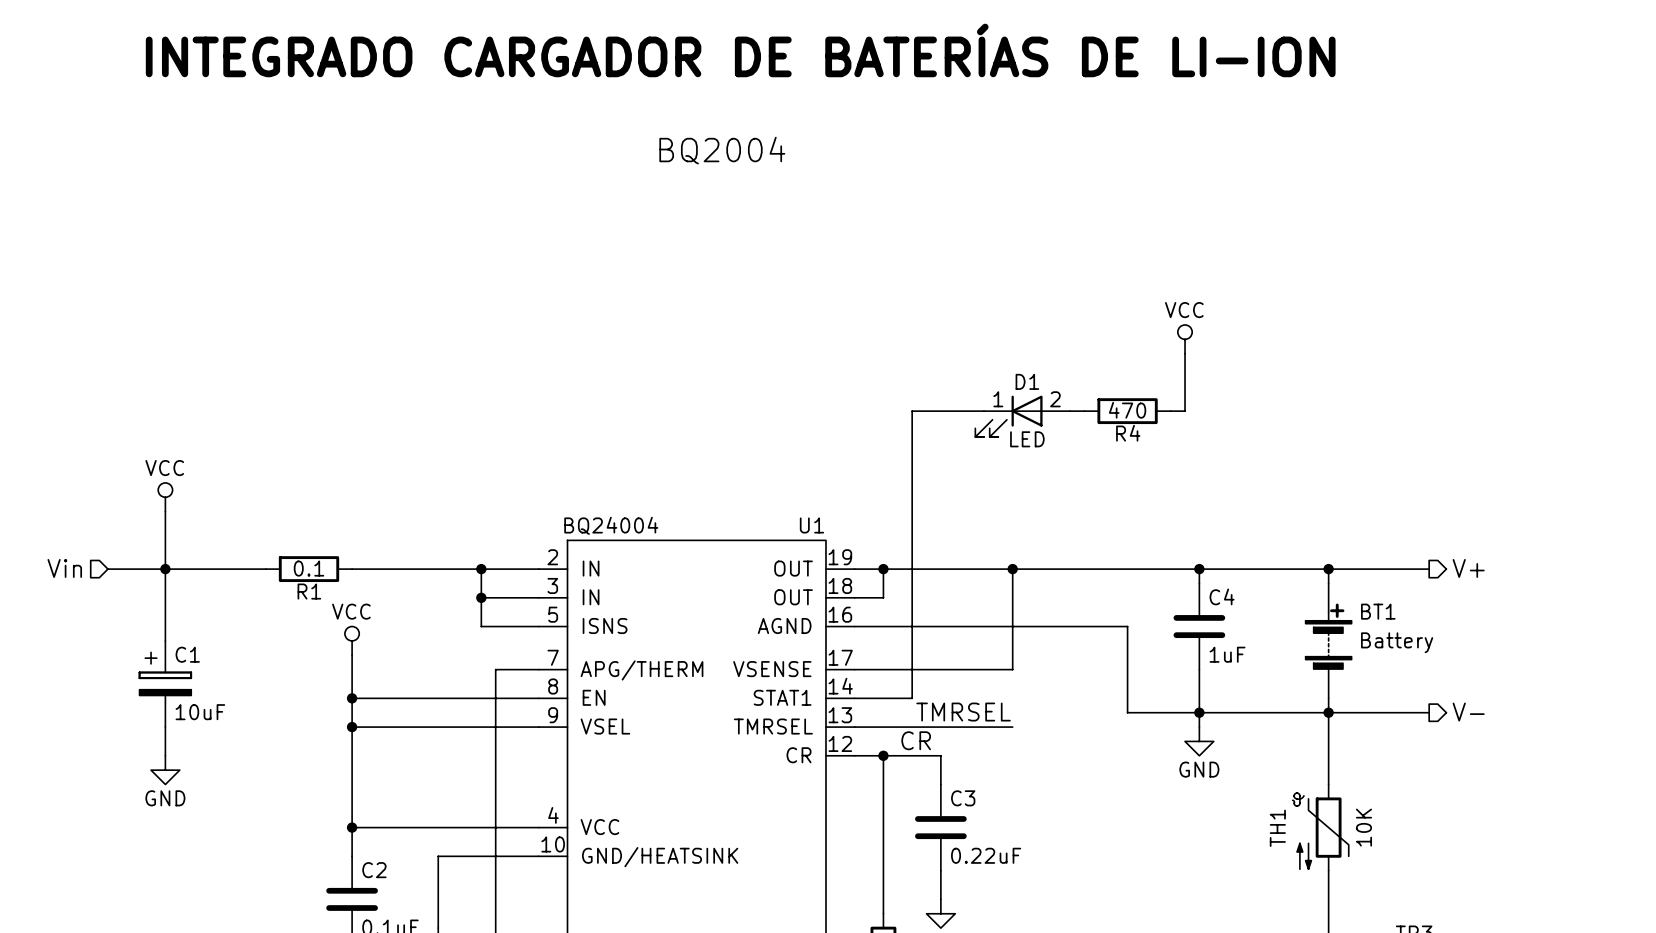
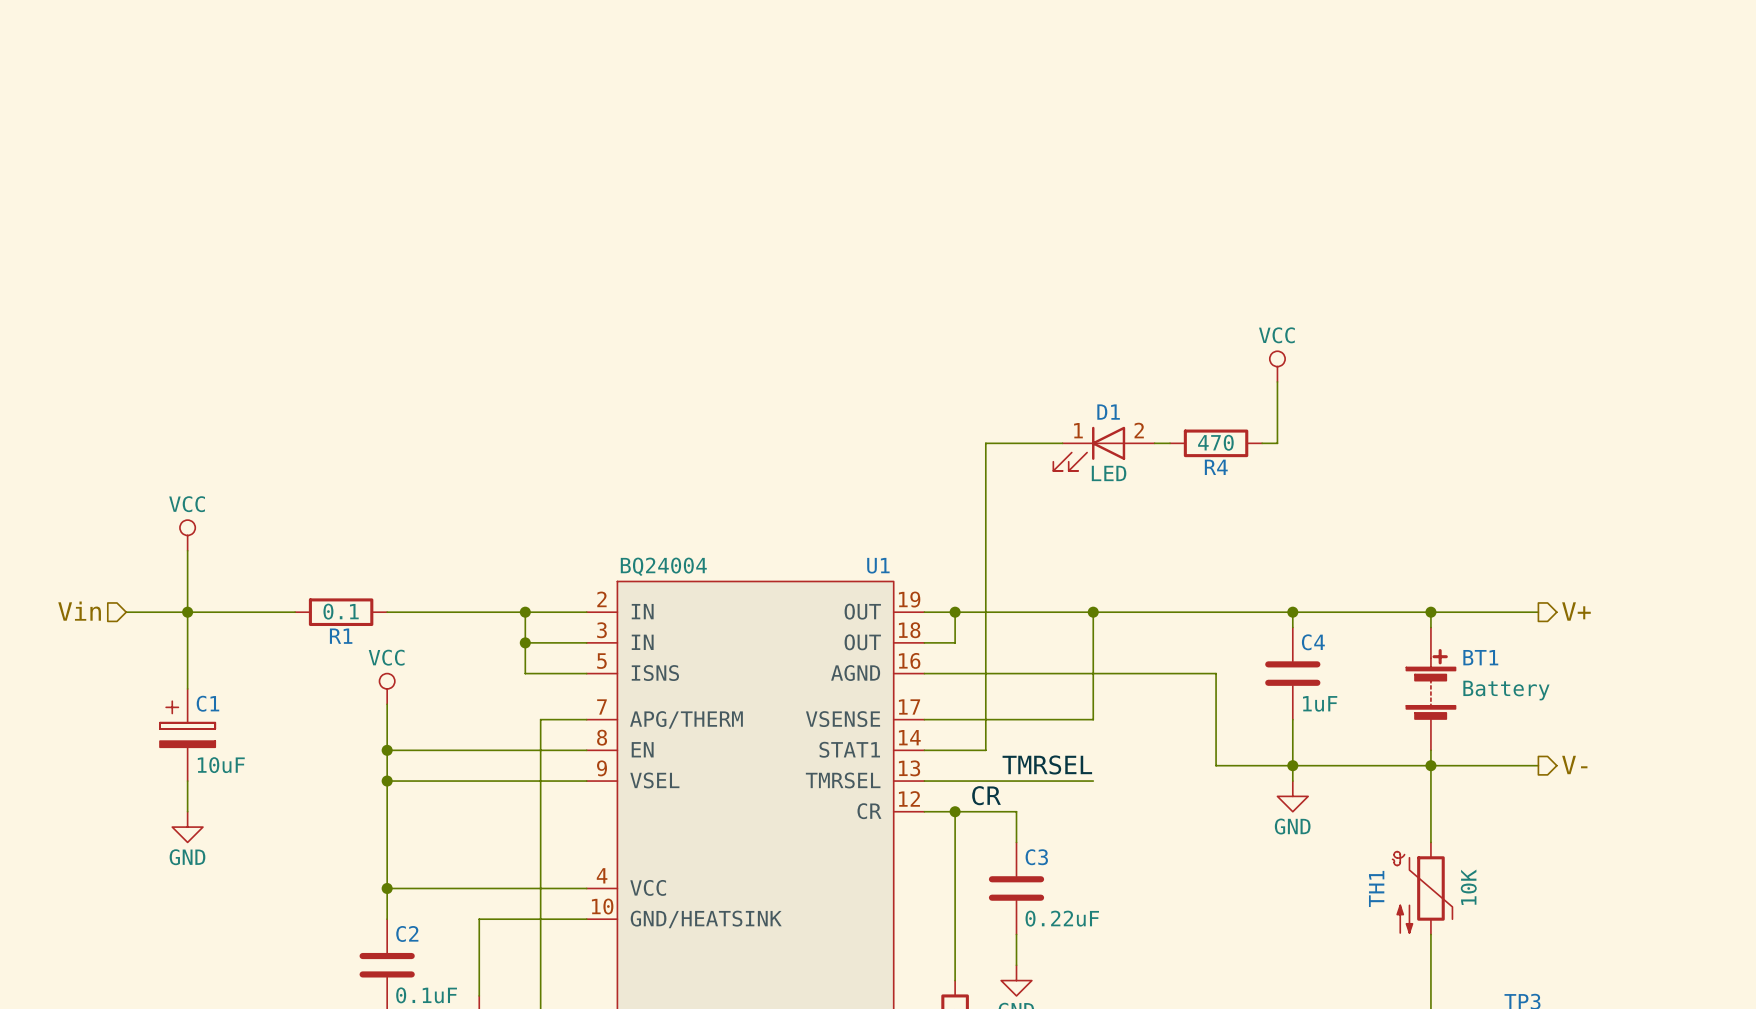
text: INTEGRADO CARGADOR DE BATERÍAS DE LI-ION (740, 50) -> none
text: BQ2004 (722, 150) -> none

